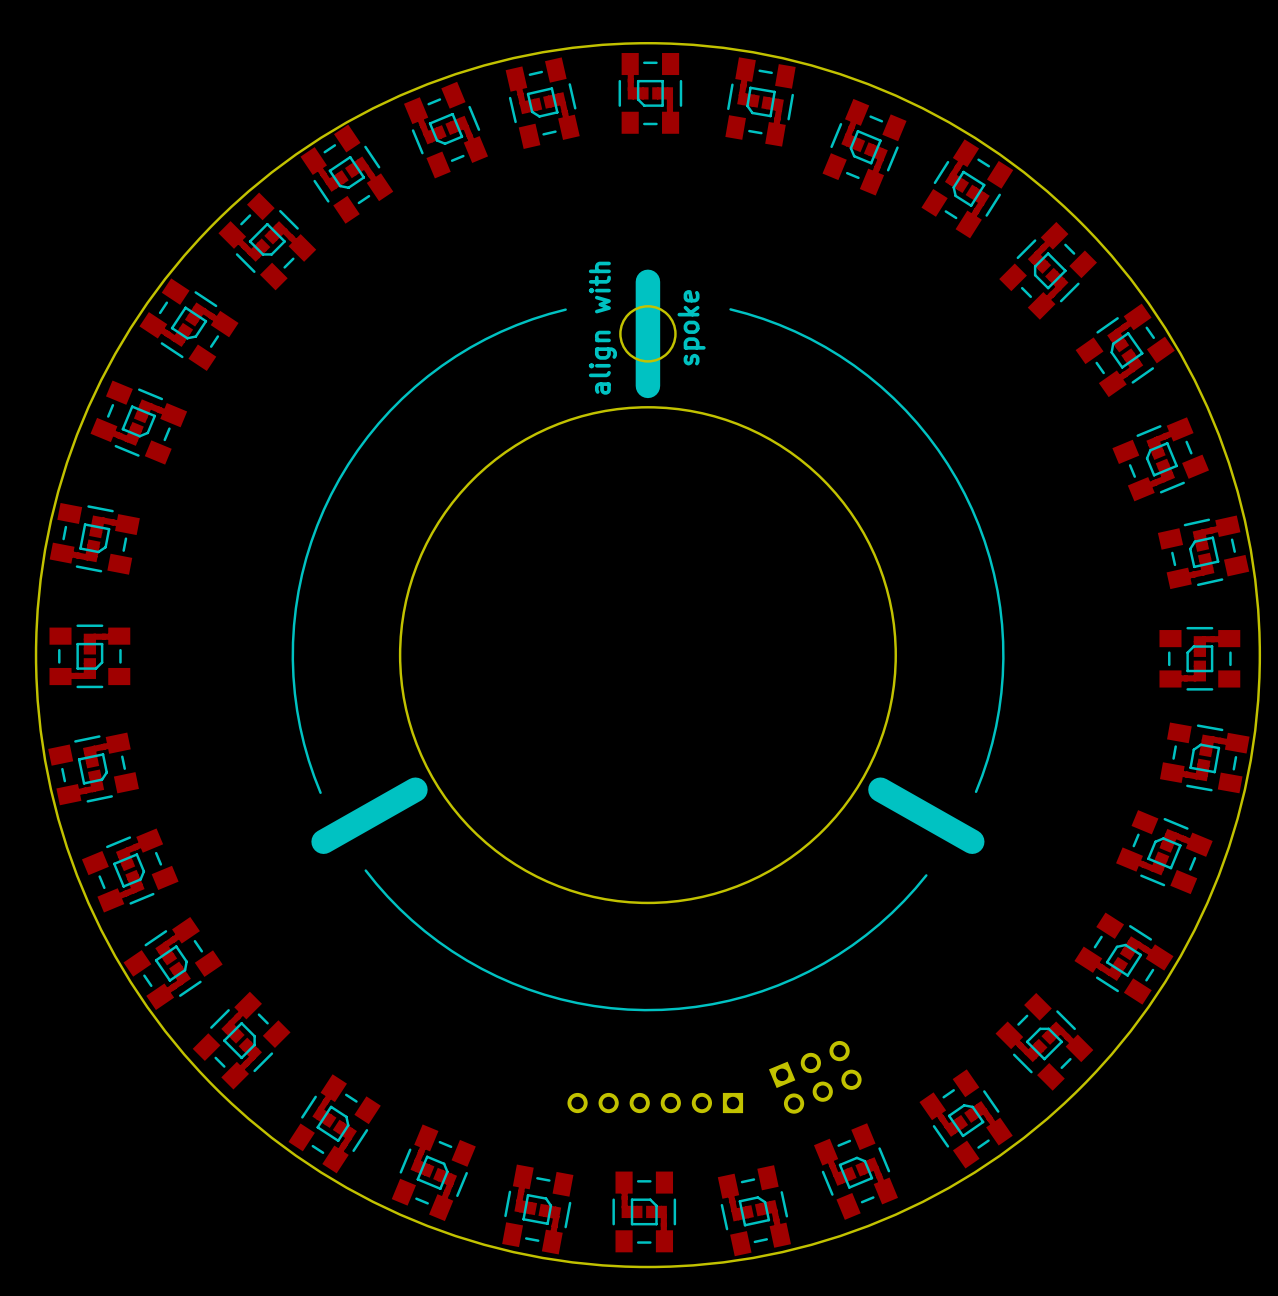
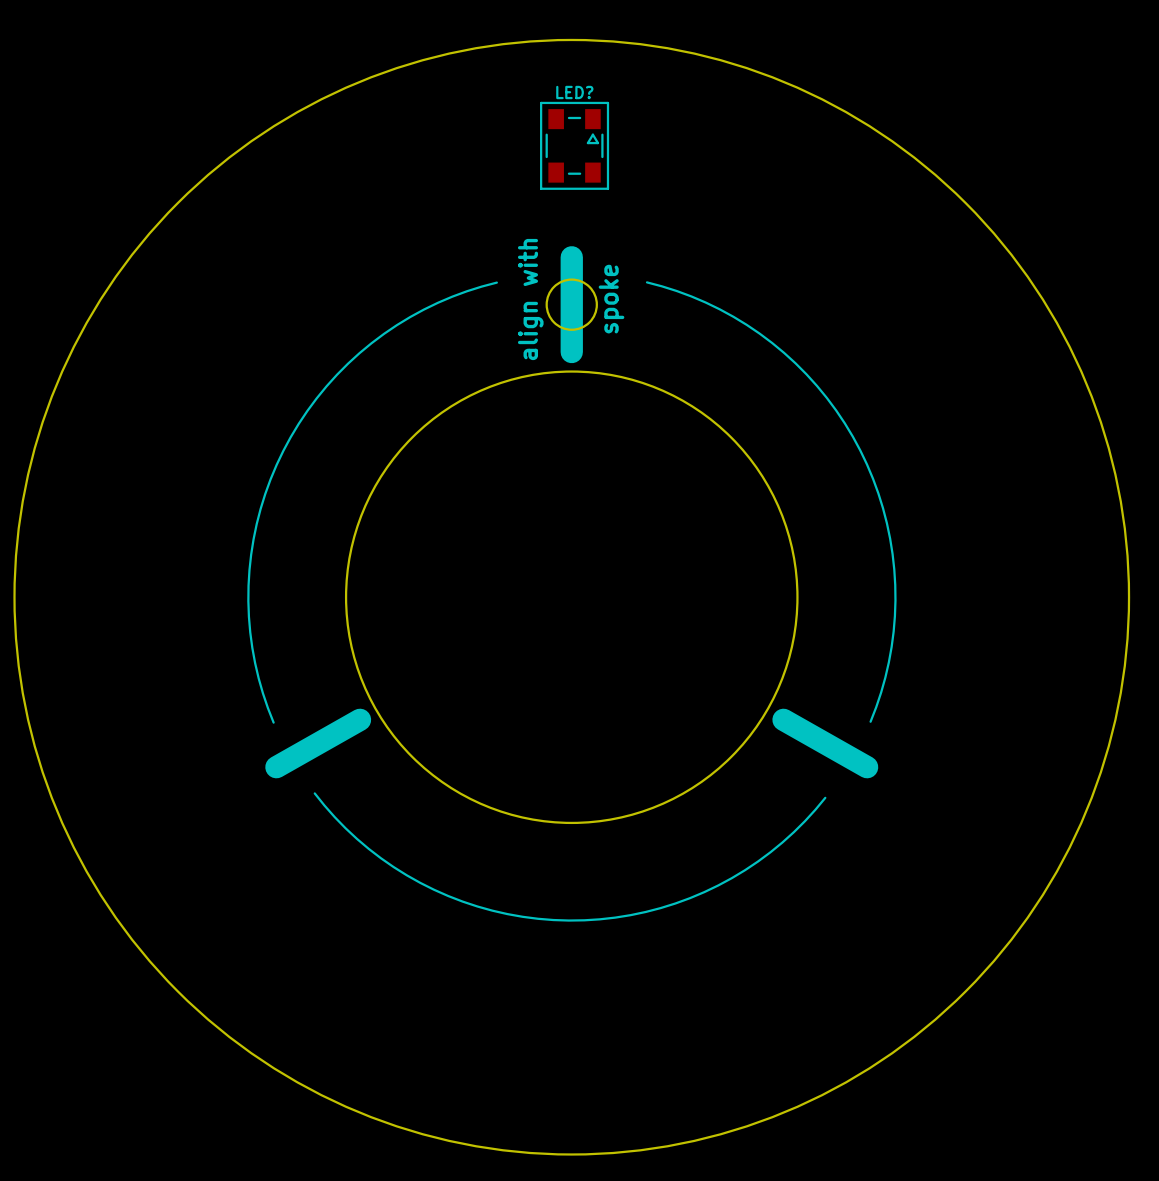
part: (650, 93) -> none
part: (760, 101) -> none
part: (542, 103) -> none
part: (446, 130) -> none
part: (864, 147) -> none
LED?: none -> (574, 145)
part: (346, 174) -> none
part: (967, 188) -> none
part: (267, 241) -> none
part: (1048, 270) -> none
part: (189, 324) -> none
part: (1125, 350) -> none
part: (138, 422) -> none
part: (1160, 459) -> none
part: (94, 538) -> none
part: (1203, 552) -> none
part: (89, 656) -> none
part: (1199, 658) -> none
part: (1204, 757) -> none
part: (93, 768) -> none
part: (1164, 852) -> none
part: (130, 870) -> none
part: (1123, 958) -> none
part: (173, 963) -> none
part: (241, 1040) -> none
part: (1044, 1041) -> none
part: (815, 1077) -> none
part: (655, 1103) -> none
part: (966, 1118) -> none
part: (334, 1123) -> none
part: (855, 1171) -> none
part: (433, 1172) -> none
part: (537, 1209) -> none
part: (754, 1210) -> none
part: (644, 1211) -> none

